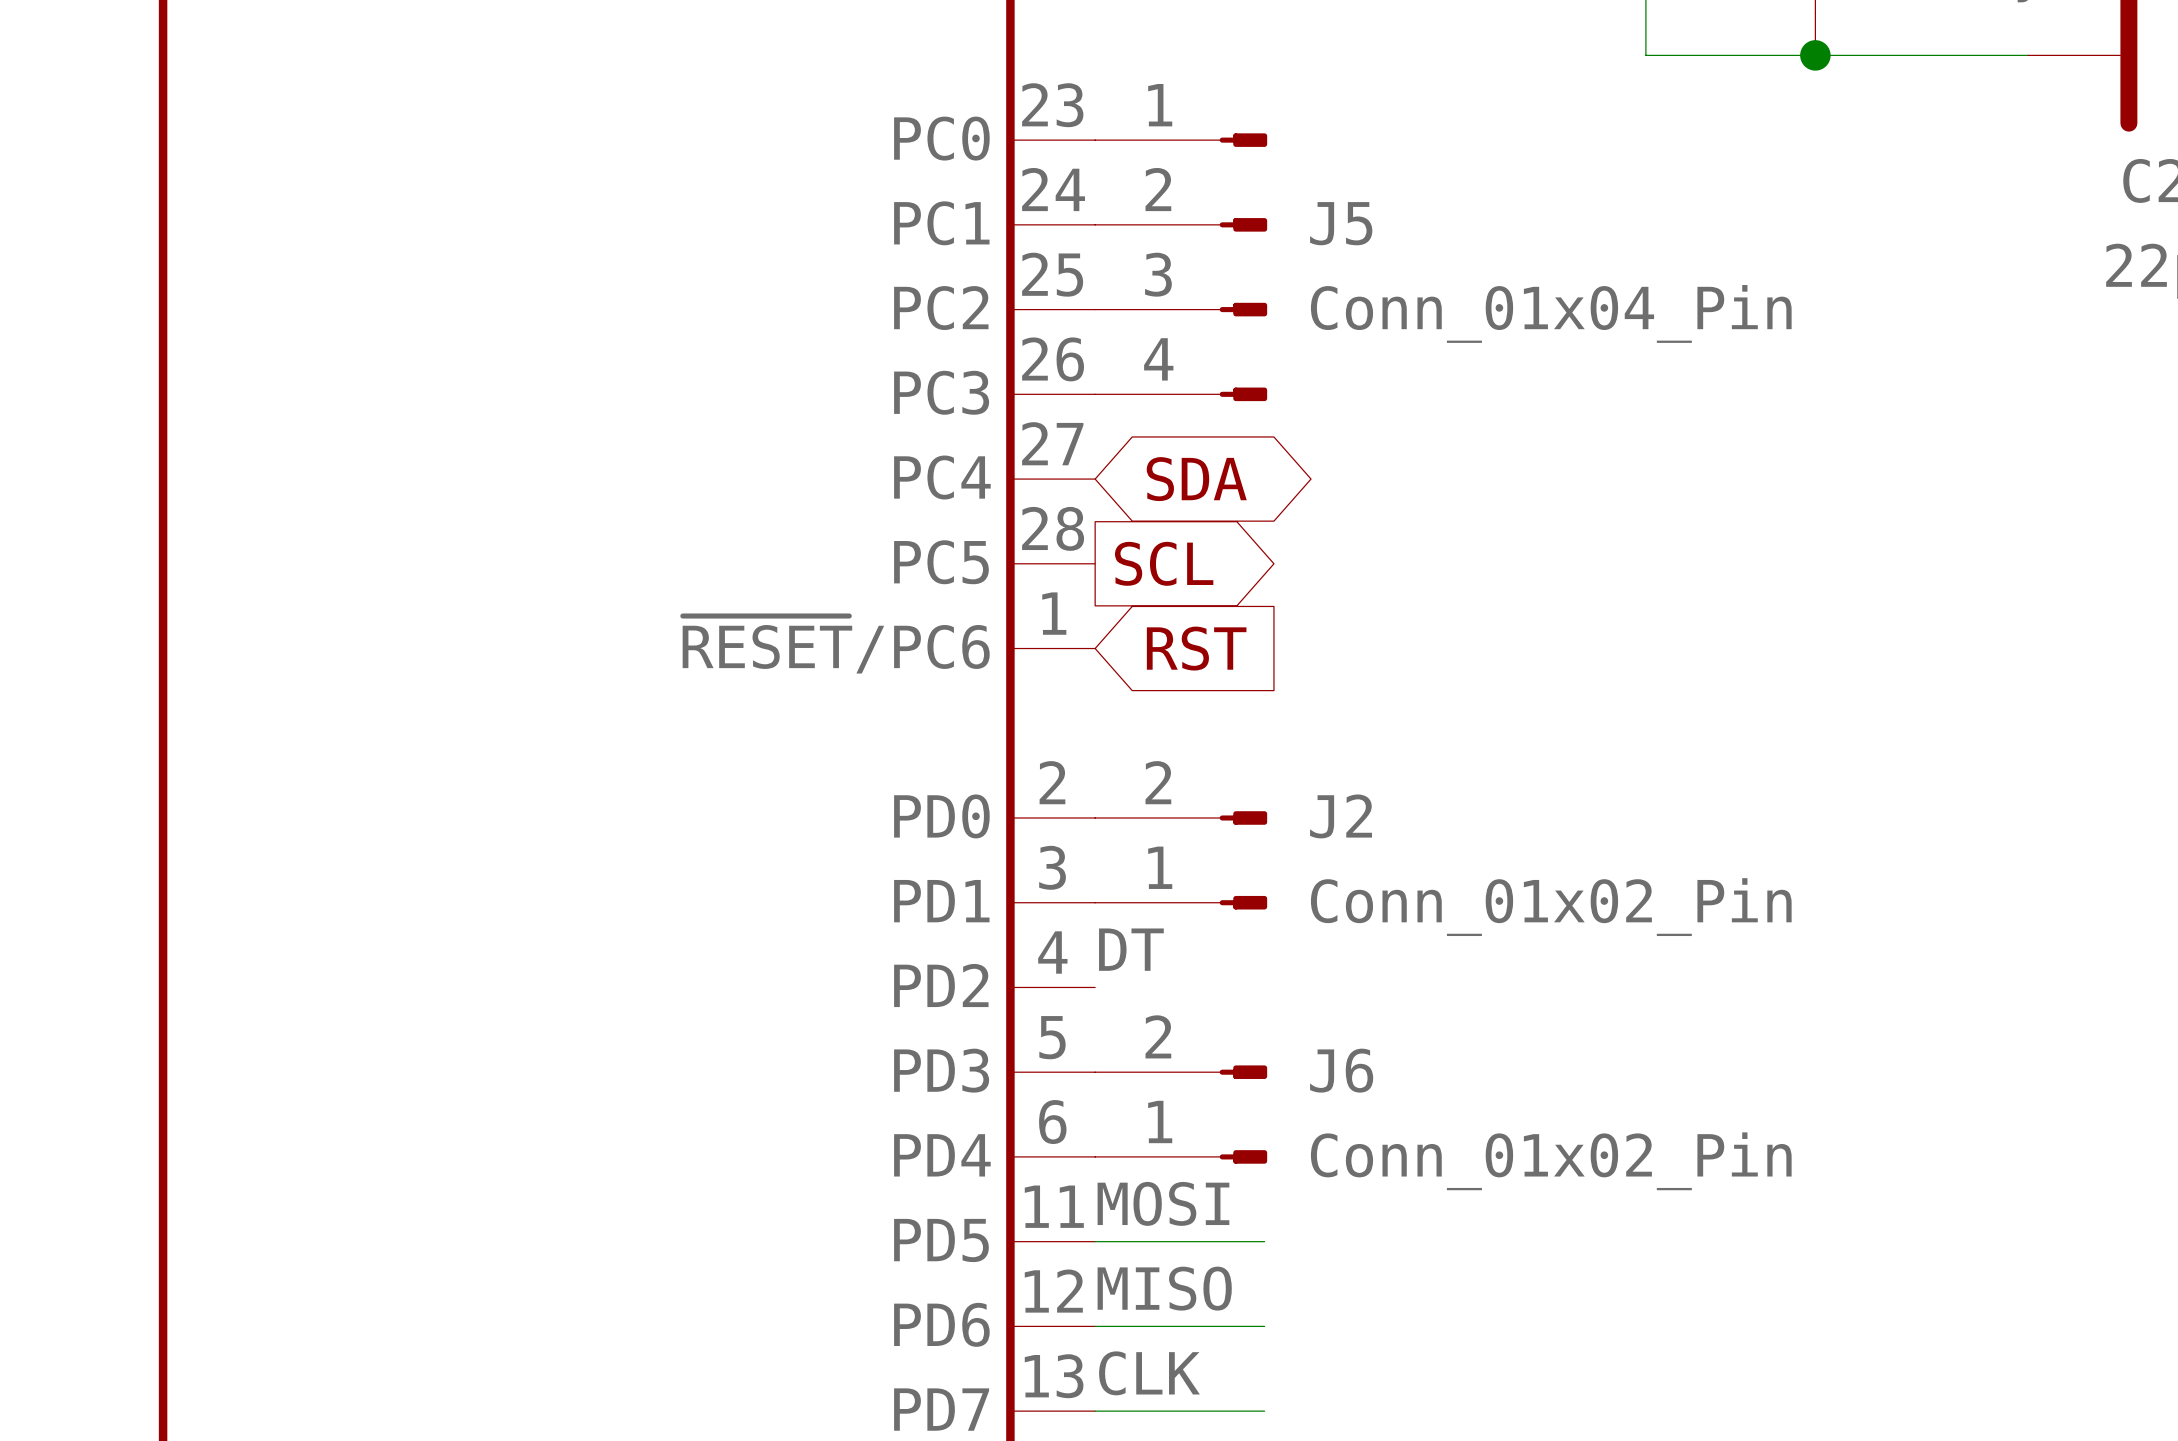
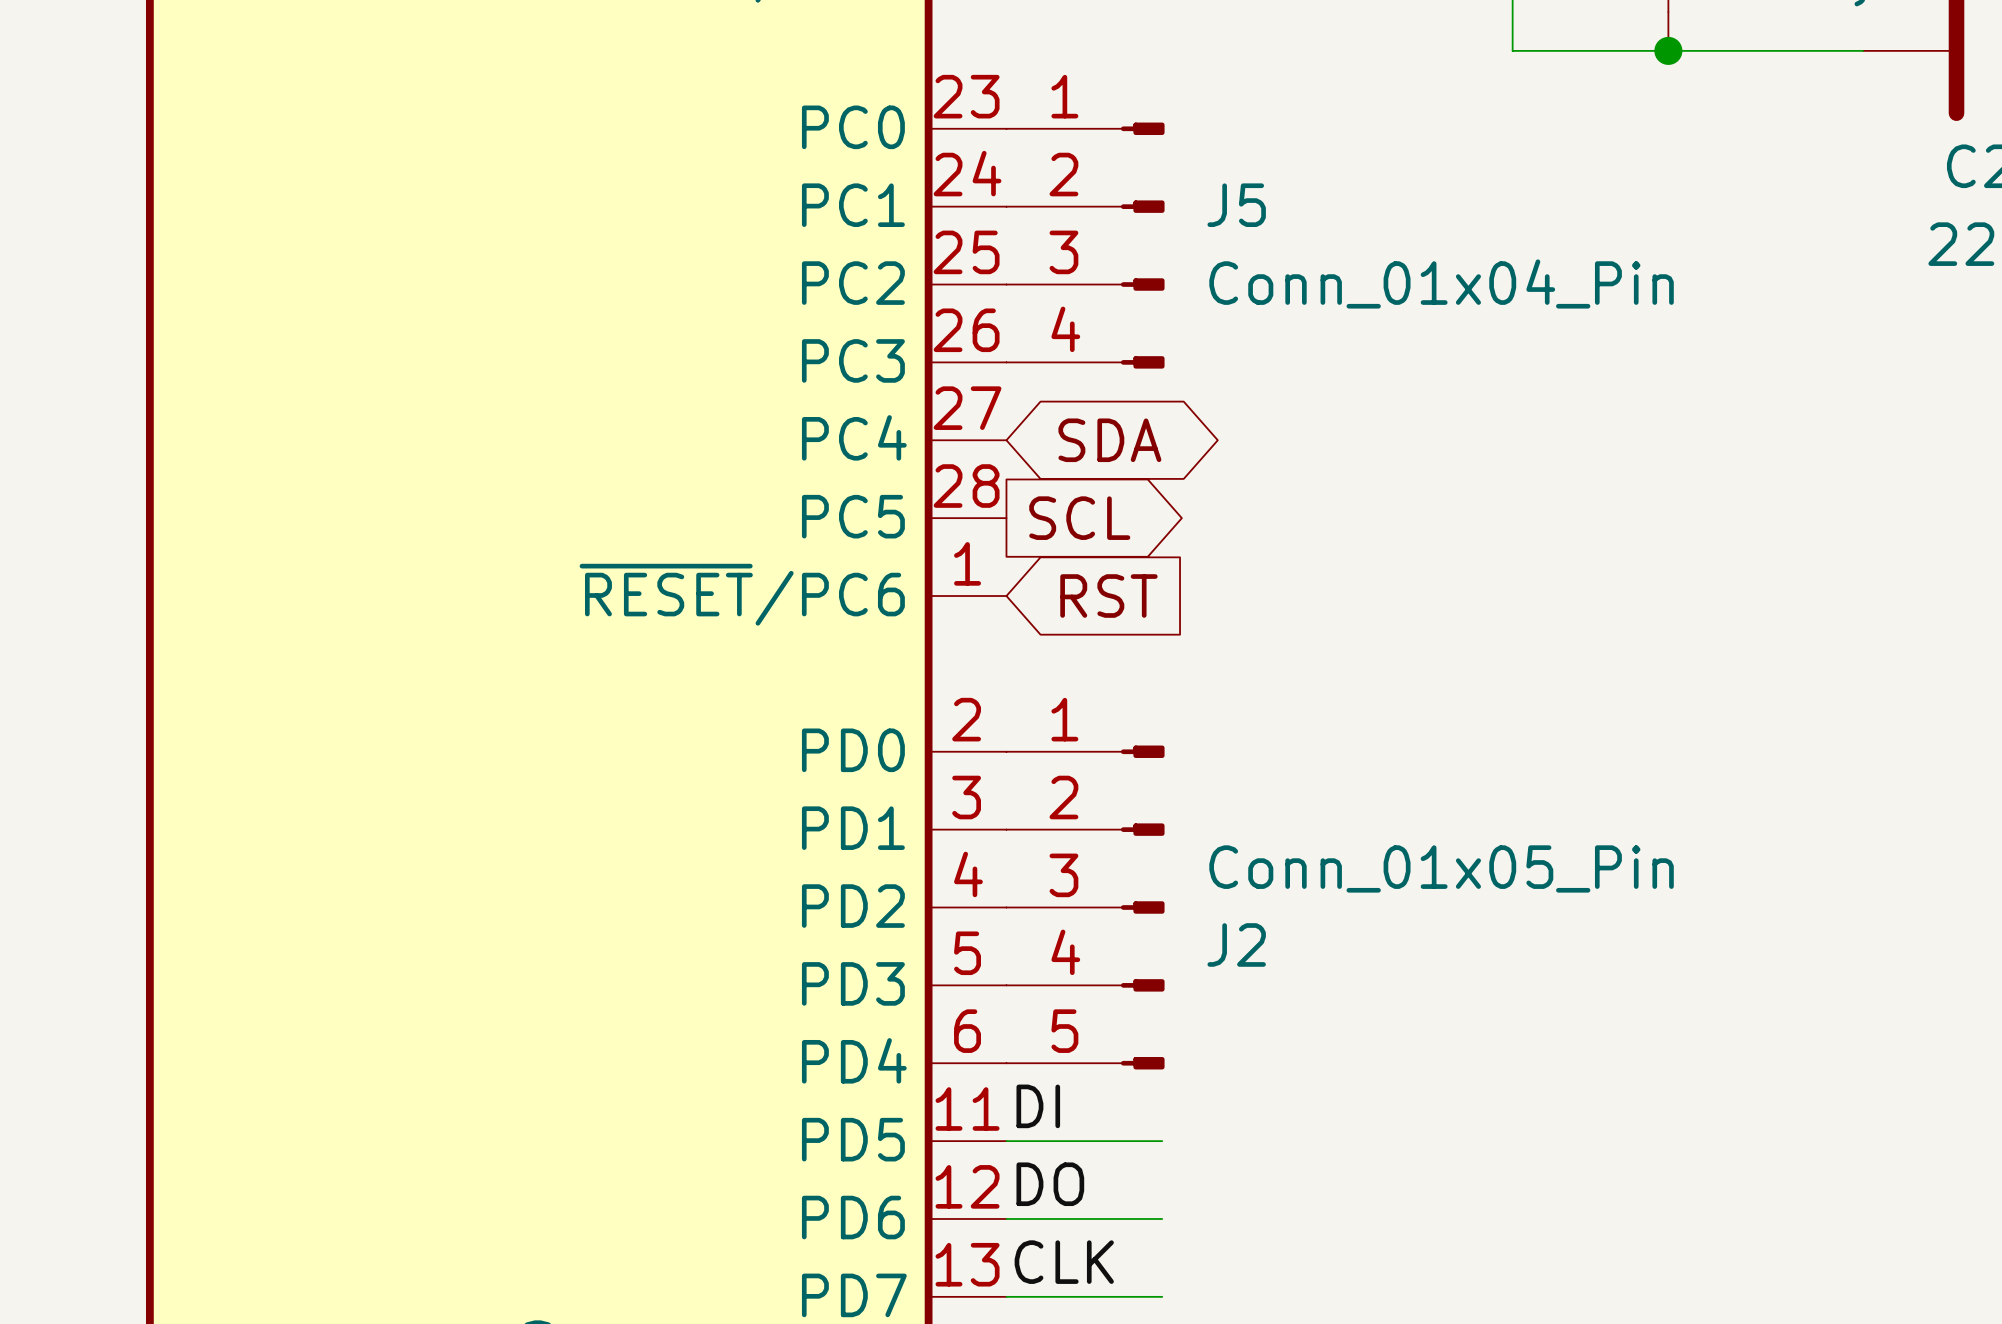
J2 symbol: [1095, 811, 1268, 910] -> [1006, 745, 1165, 1070]
J2 name position: J2 (1341, 816) -> J2 (1236, 944)
J2 value: Conn_01x02_Pin (1551, 907) -> Conn_01x05_Pin (1441, 868)
label: DT (1131, 949) -> none
J6: Conn_01x02_Pin (1181, 1114) -> none
label: MOSI (1163, 1203) -> DI (1038, 1106)
label: MISO (1164, 1288) -> DO (1050, 1184)

